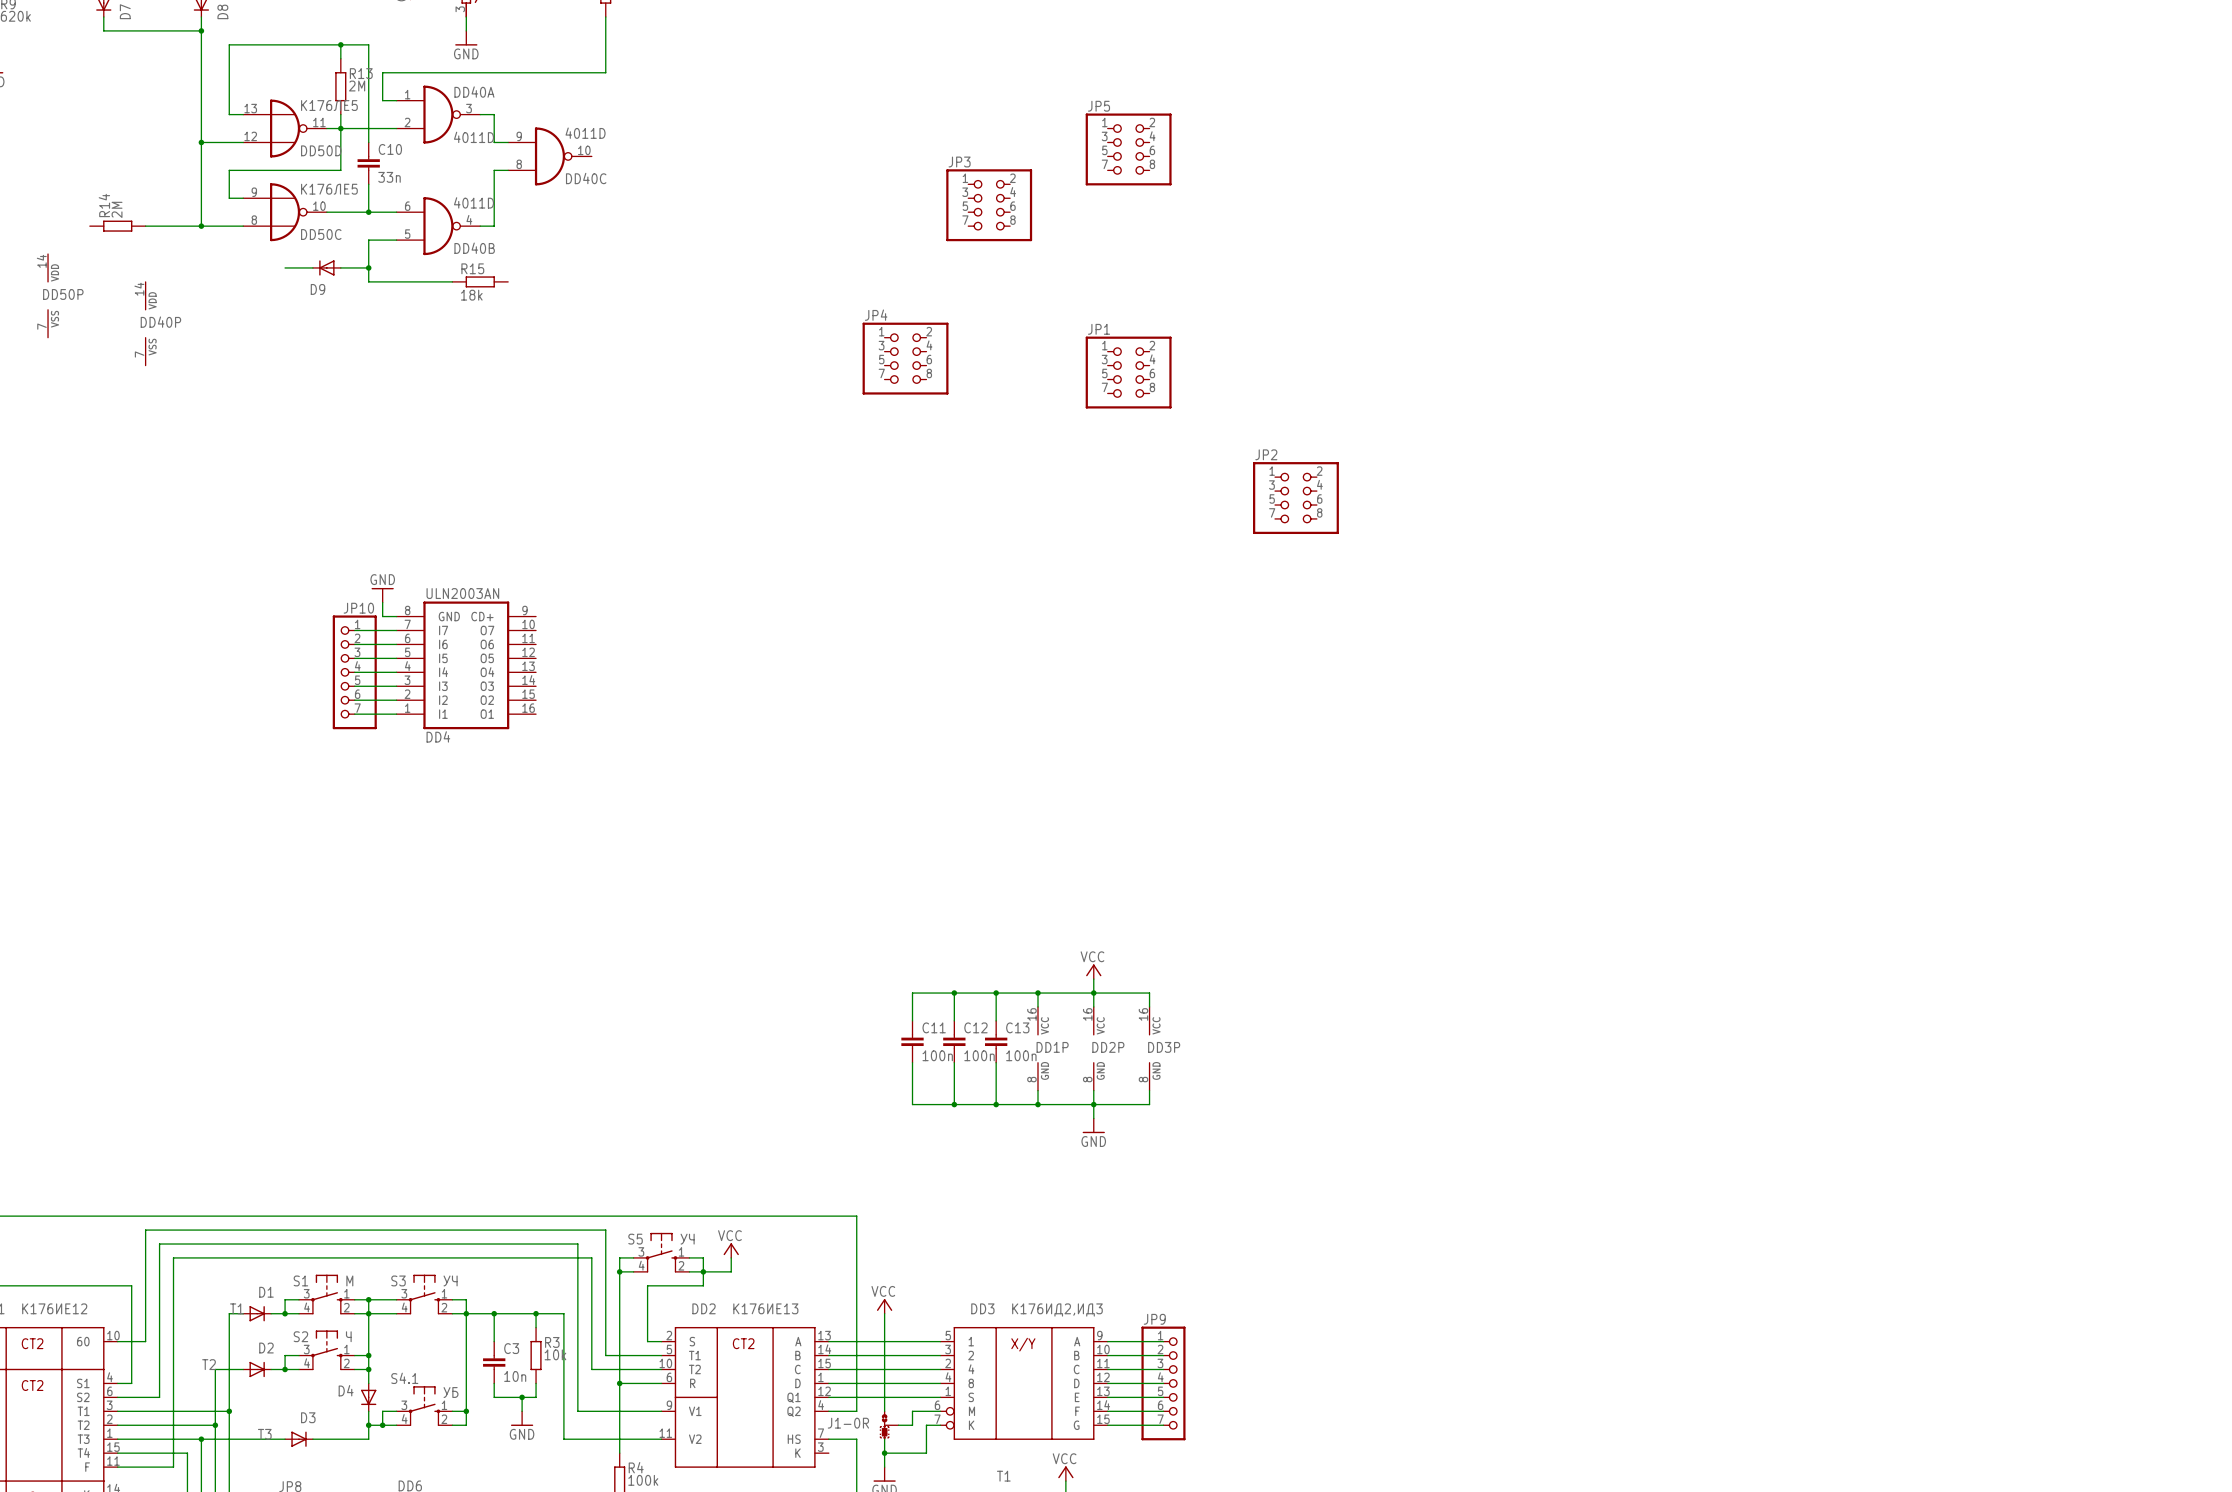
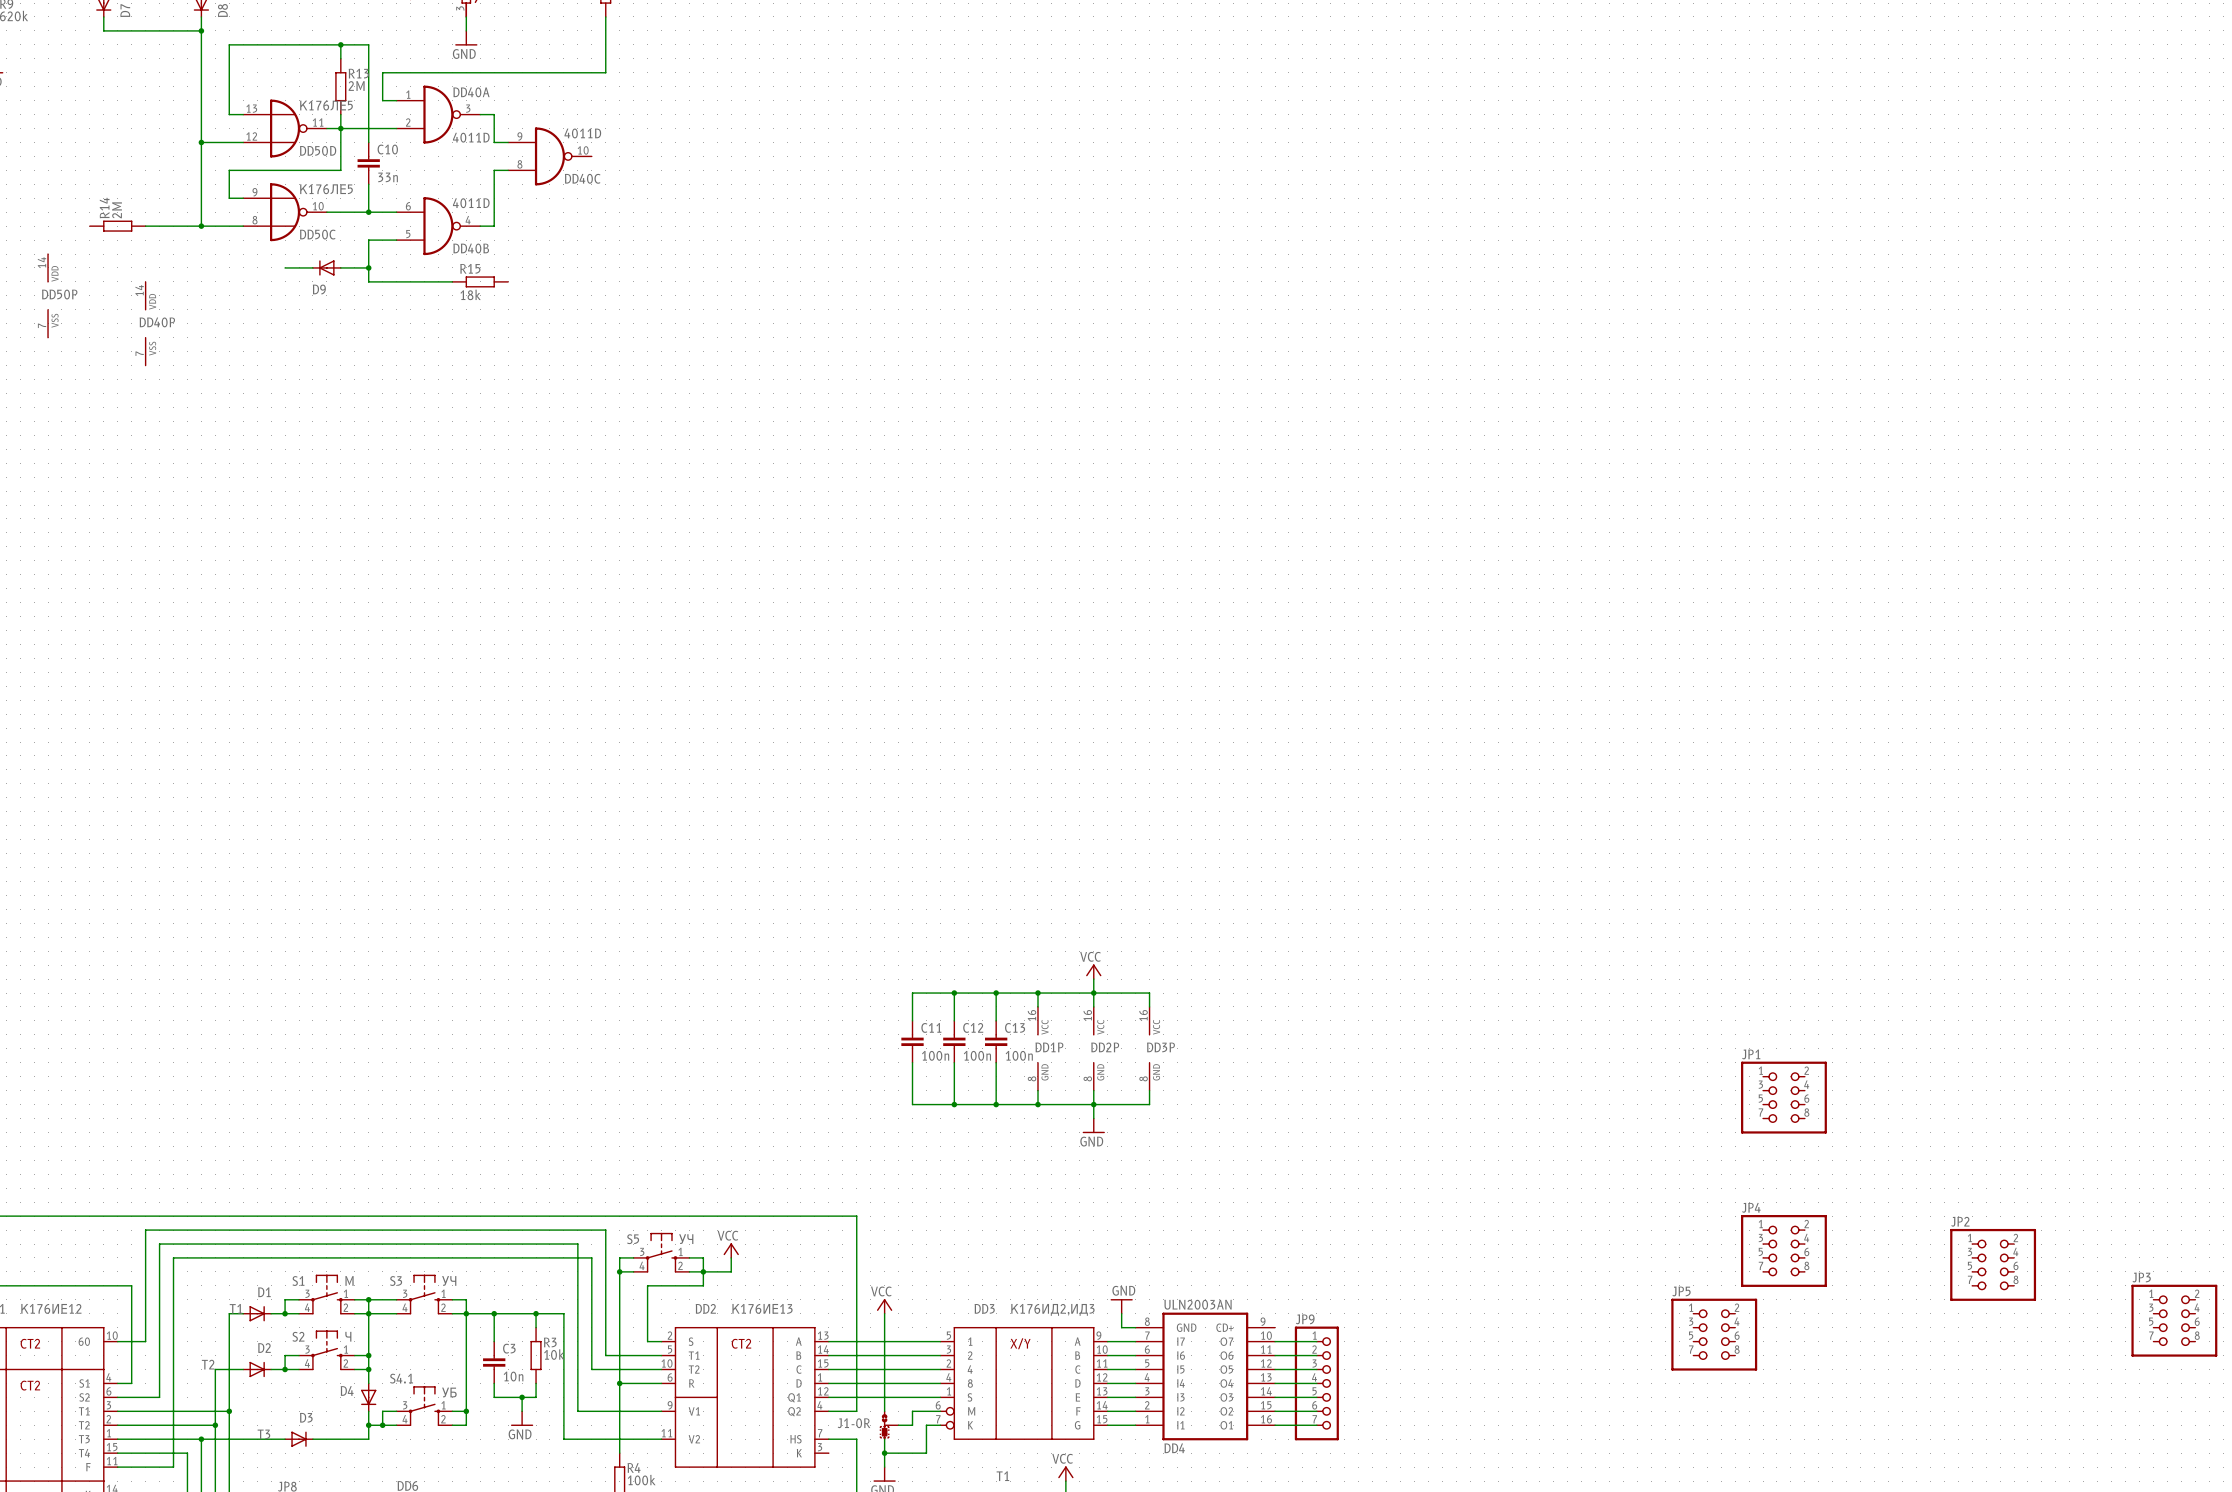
JP5 position: (1128, 149) -> (1714, 1334)
JP3 position: (989, 205) -> (2174, 1320)
JP4 position: (905, 358) -> (1783, 1250)
JP1 position: (1128, 372) -> (1783, 1097)
JP2 position: (1295, 498) -> (1993, 1264)
power symbol: GND (382, 595) -> none
wire: (382, 602) (382, 616) (396, 616) -> none
wire: (354, 630) (396, 630) -> none
wire: (354, 644) (396, 644) -> none
wire: (354, 658) (396, 658) -> none
DD4 position: (466, 665) -> (1205, 1376)
wire: (354, 672) (396, 672) -> none
JP10: (354, 672) -> none
wire: (354, 686) (396, 686) -> none
wire: (354, 700) (396, 700) -> none
wire: (354, 714) (396, 714) -> none
power symbol: none -> GND (1121, 1306)
wire: none -> (1121, 1313) (1121, 1327) (1135, 1327)
wire: none -> (1275, 1341) (1316, 1341)
wire: none -> (1275, 1355) (1316, 1355)
wire: none -> (1275, 1369) (1316, 1369)
JP9 position: (1163, 1383) -> (1316, 1383)
wire: none -> (1275, 1383) (1316, 1383)
wire: none -> (1275, 1397) (1316, 1397)
wire: none -> (1275, 1411) (1316, 1411)
wire: none -> (1275, 1425) (1316, 1425)

